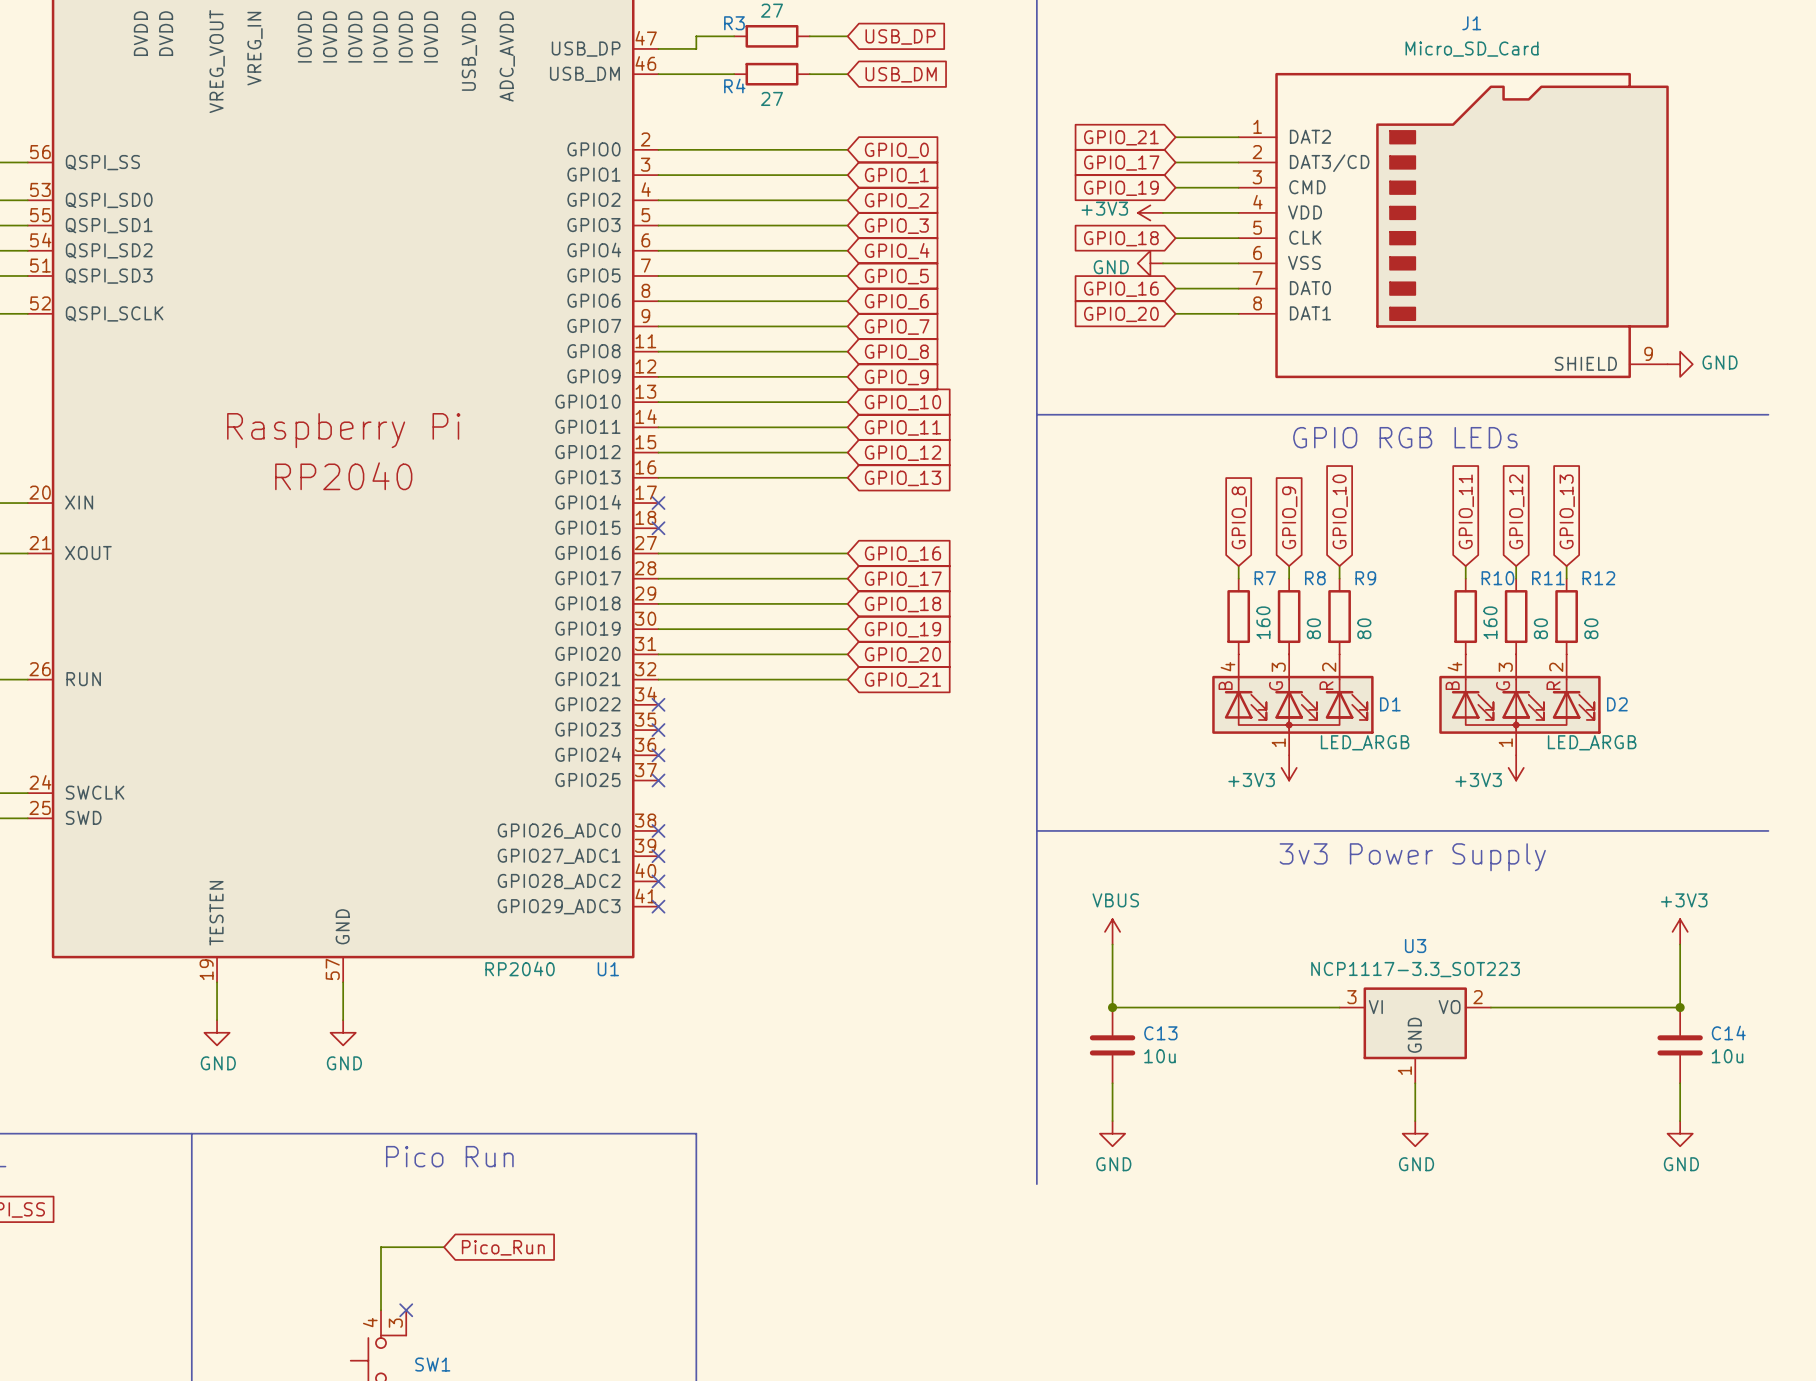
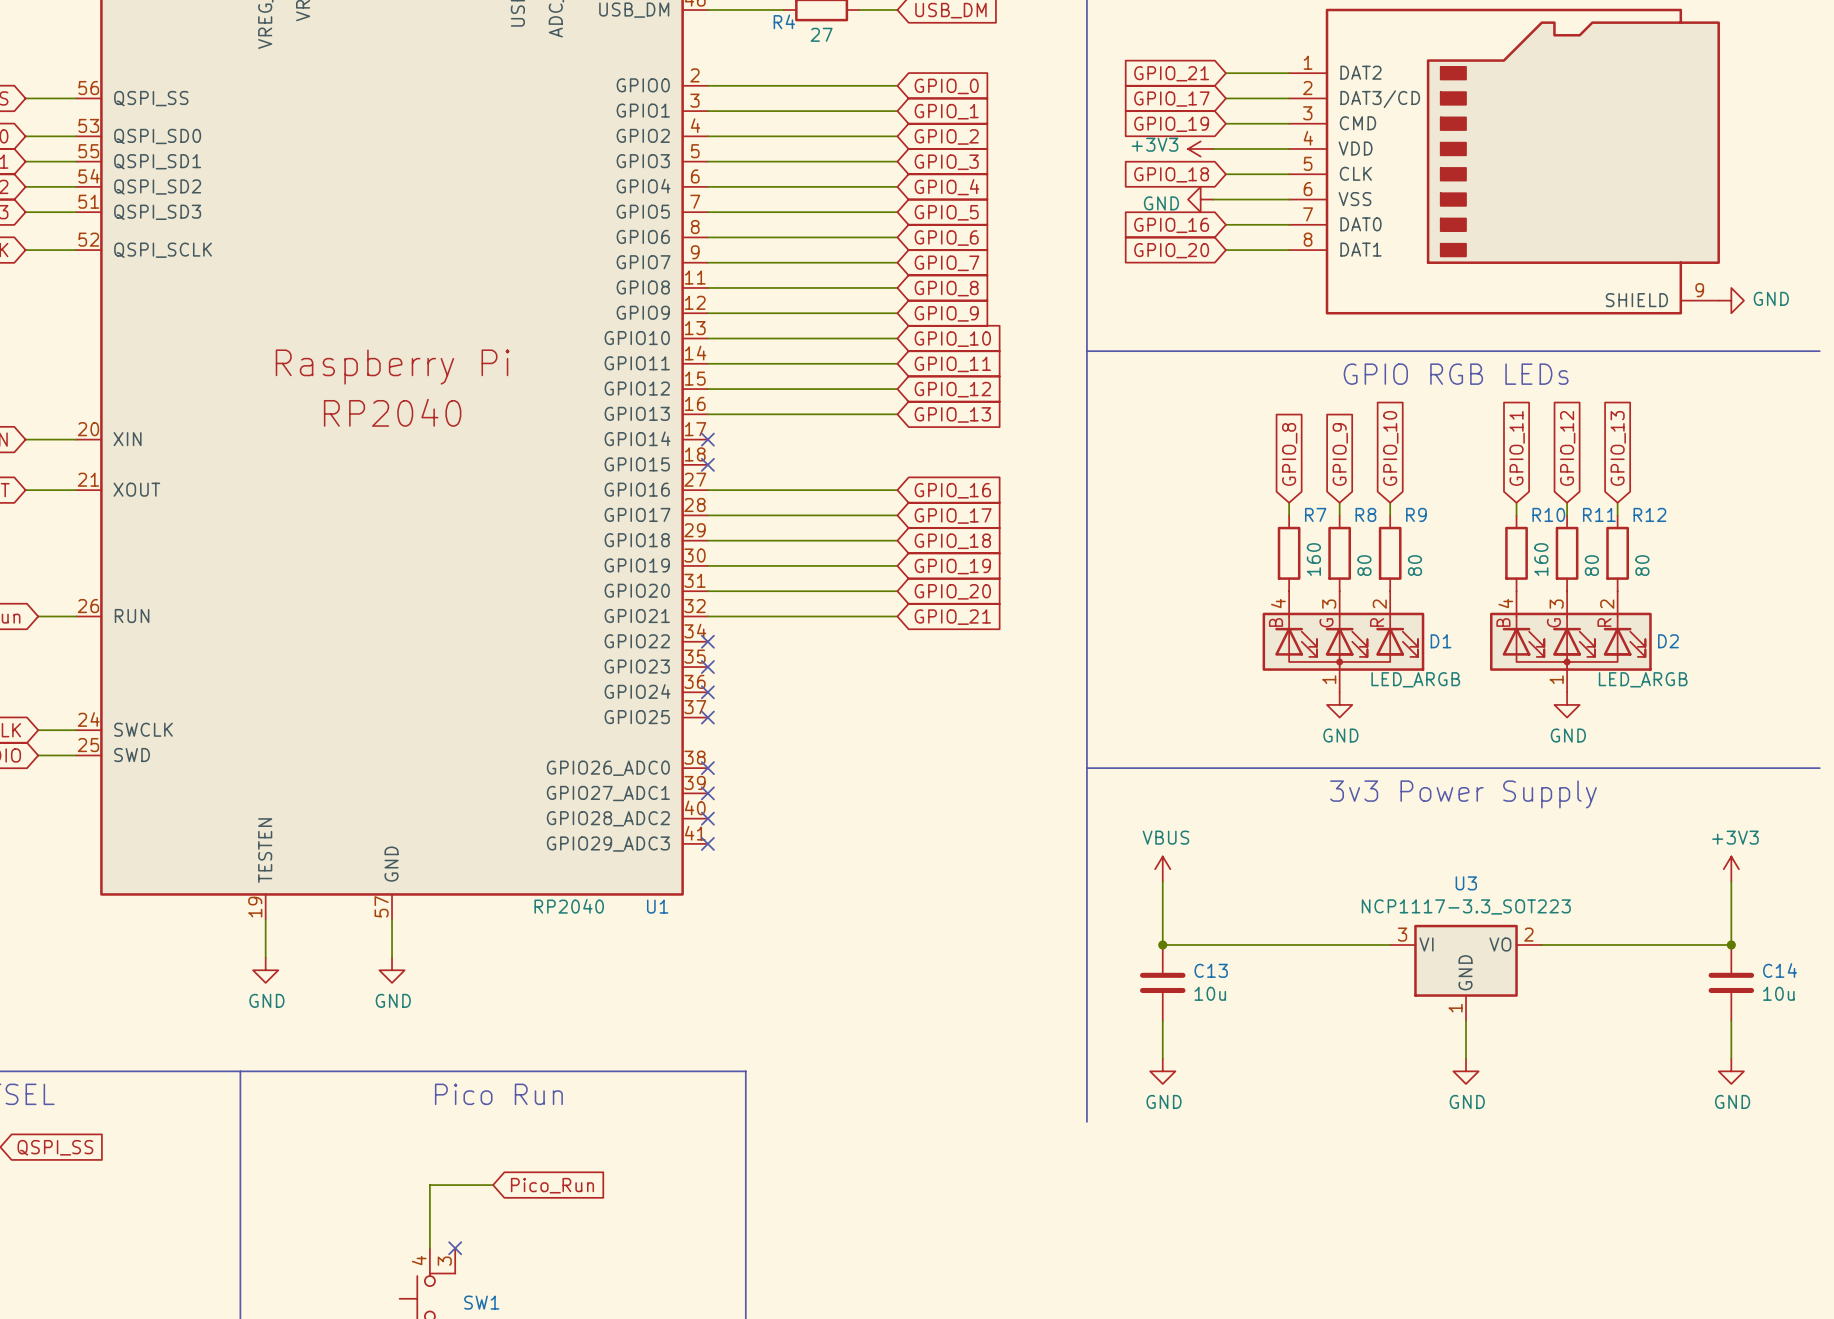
power symbol: +3V3 (1289, 767) -> GND (1339, 704)
power symbol: +3V3 (1516, 767) -> GND (1567, 704)

